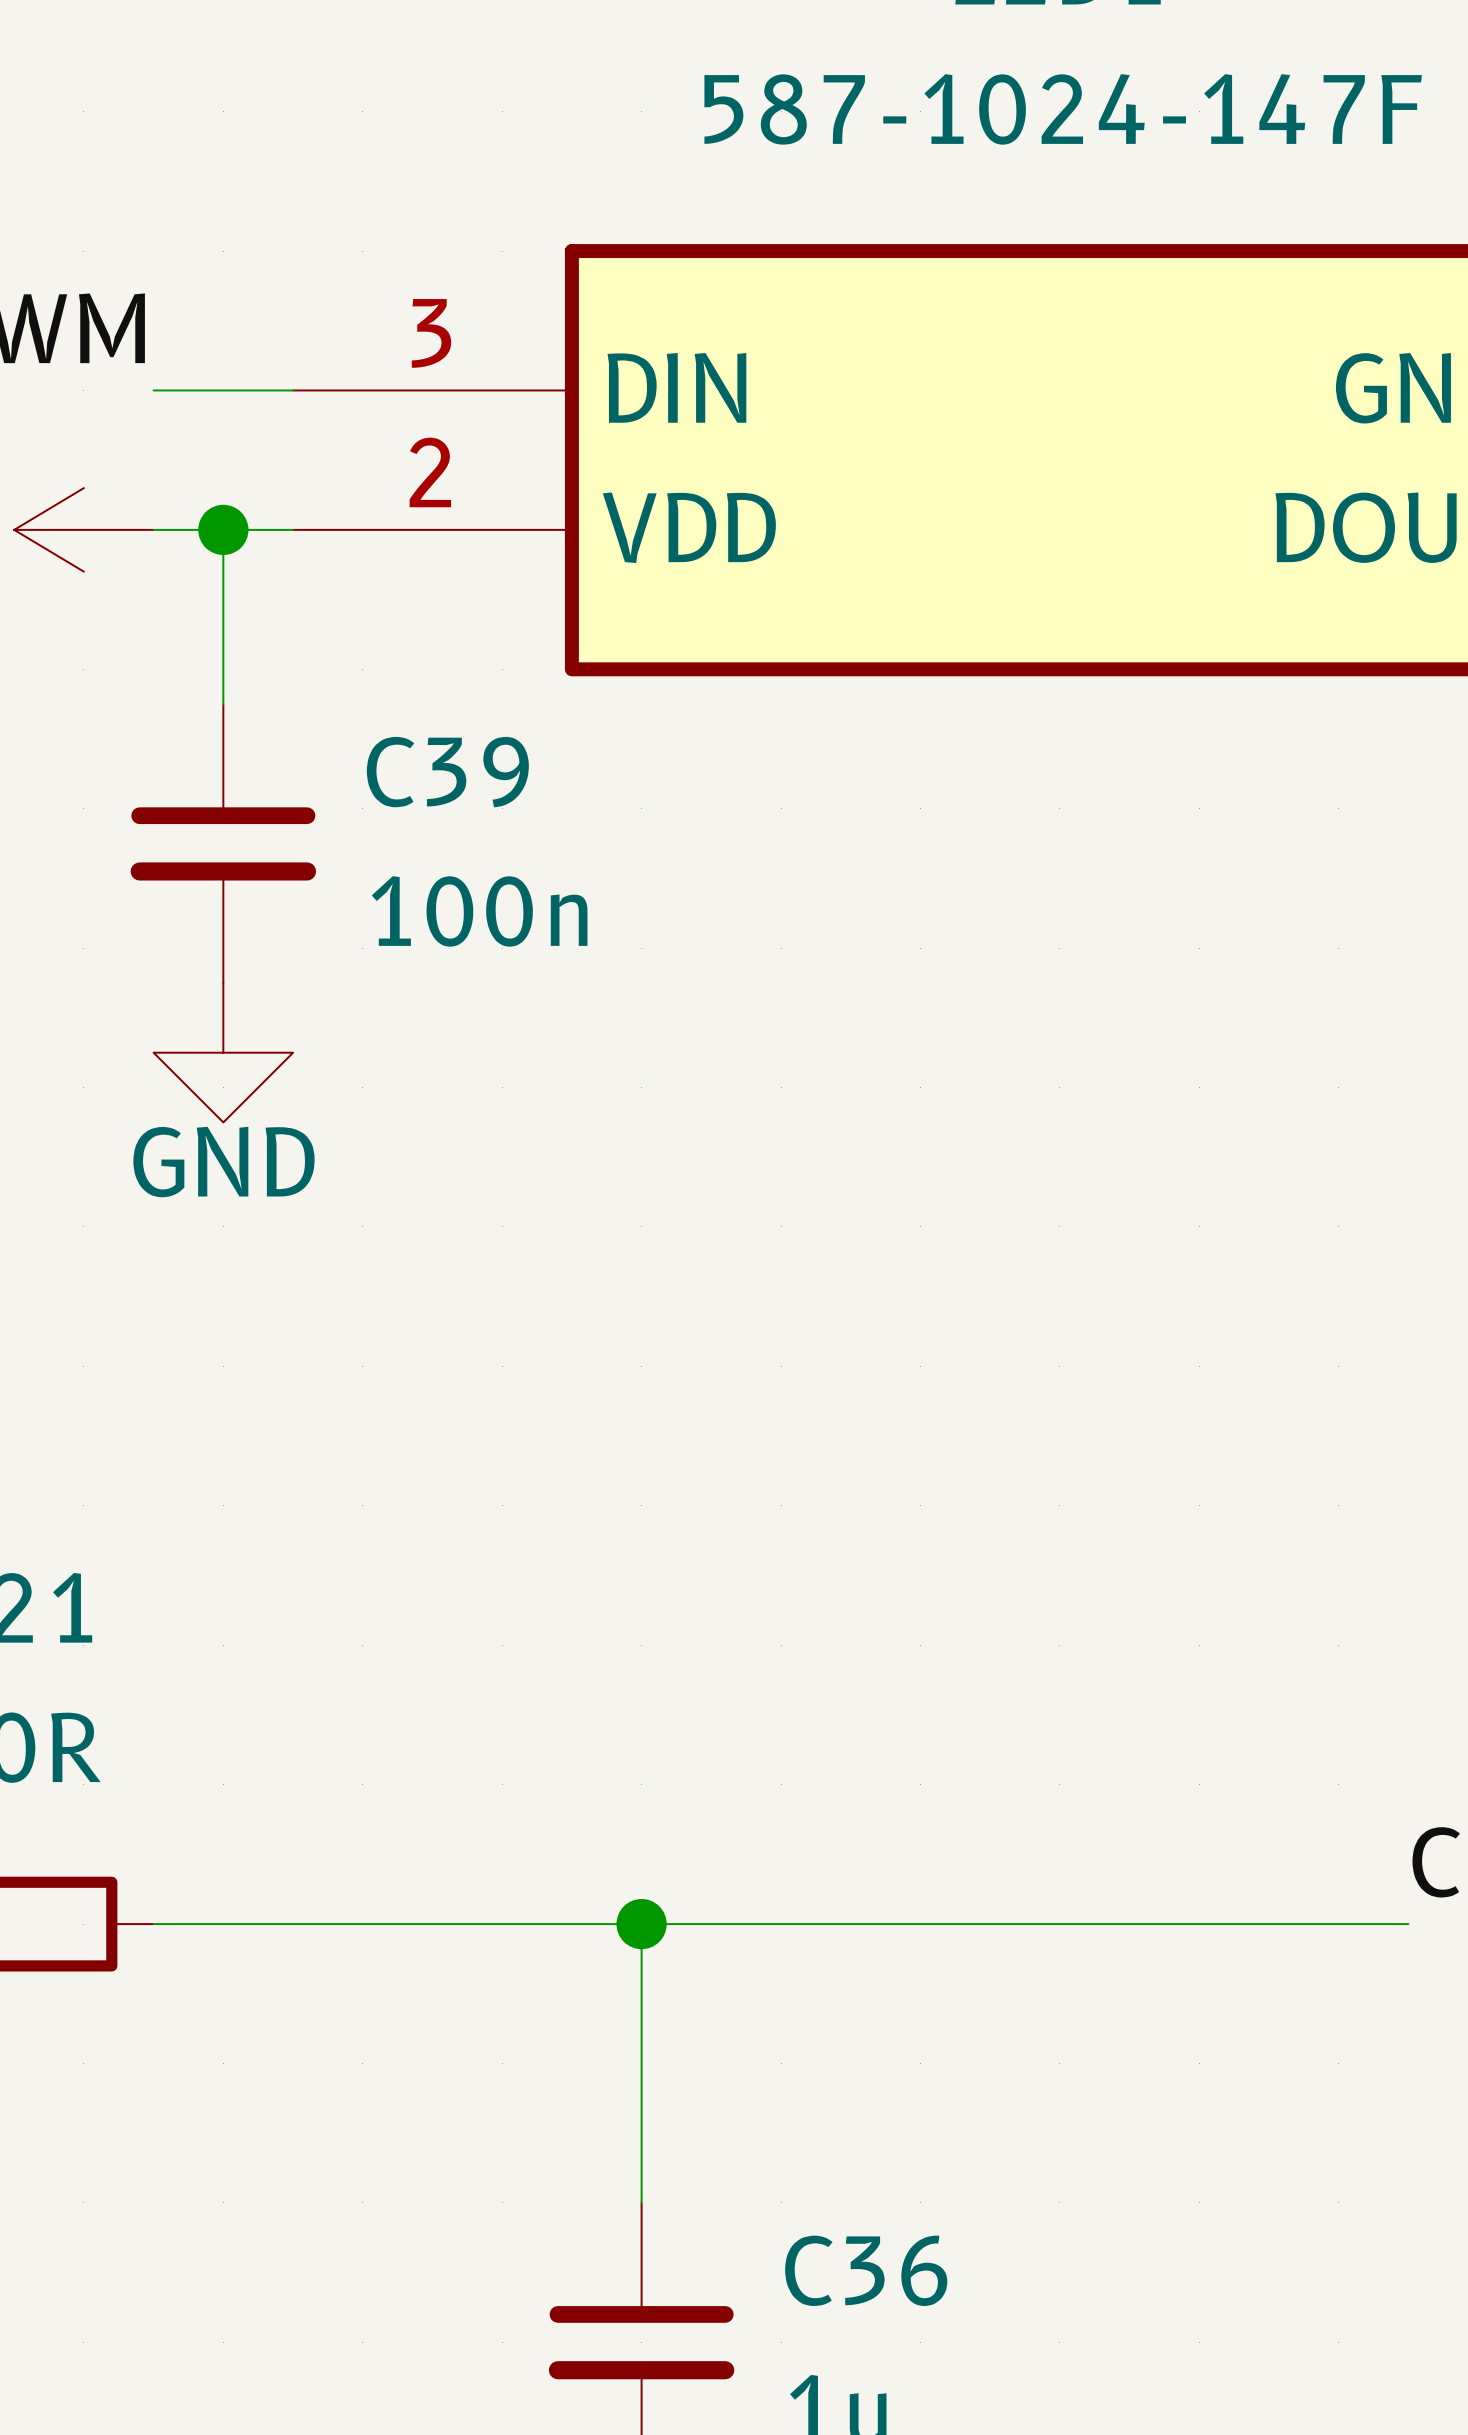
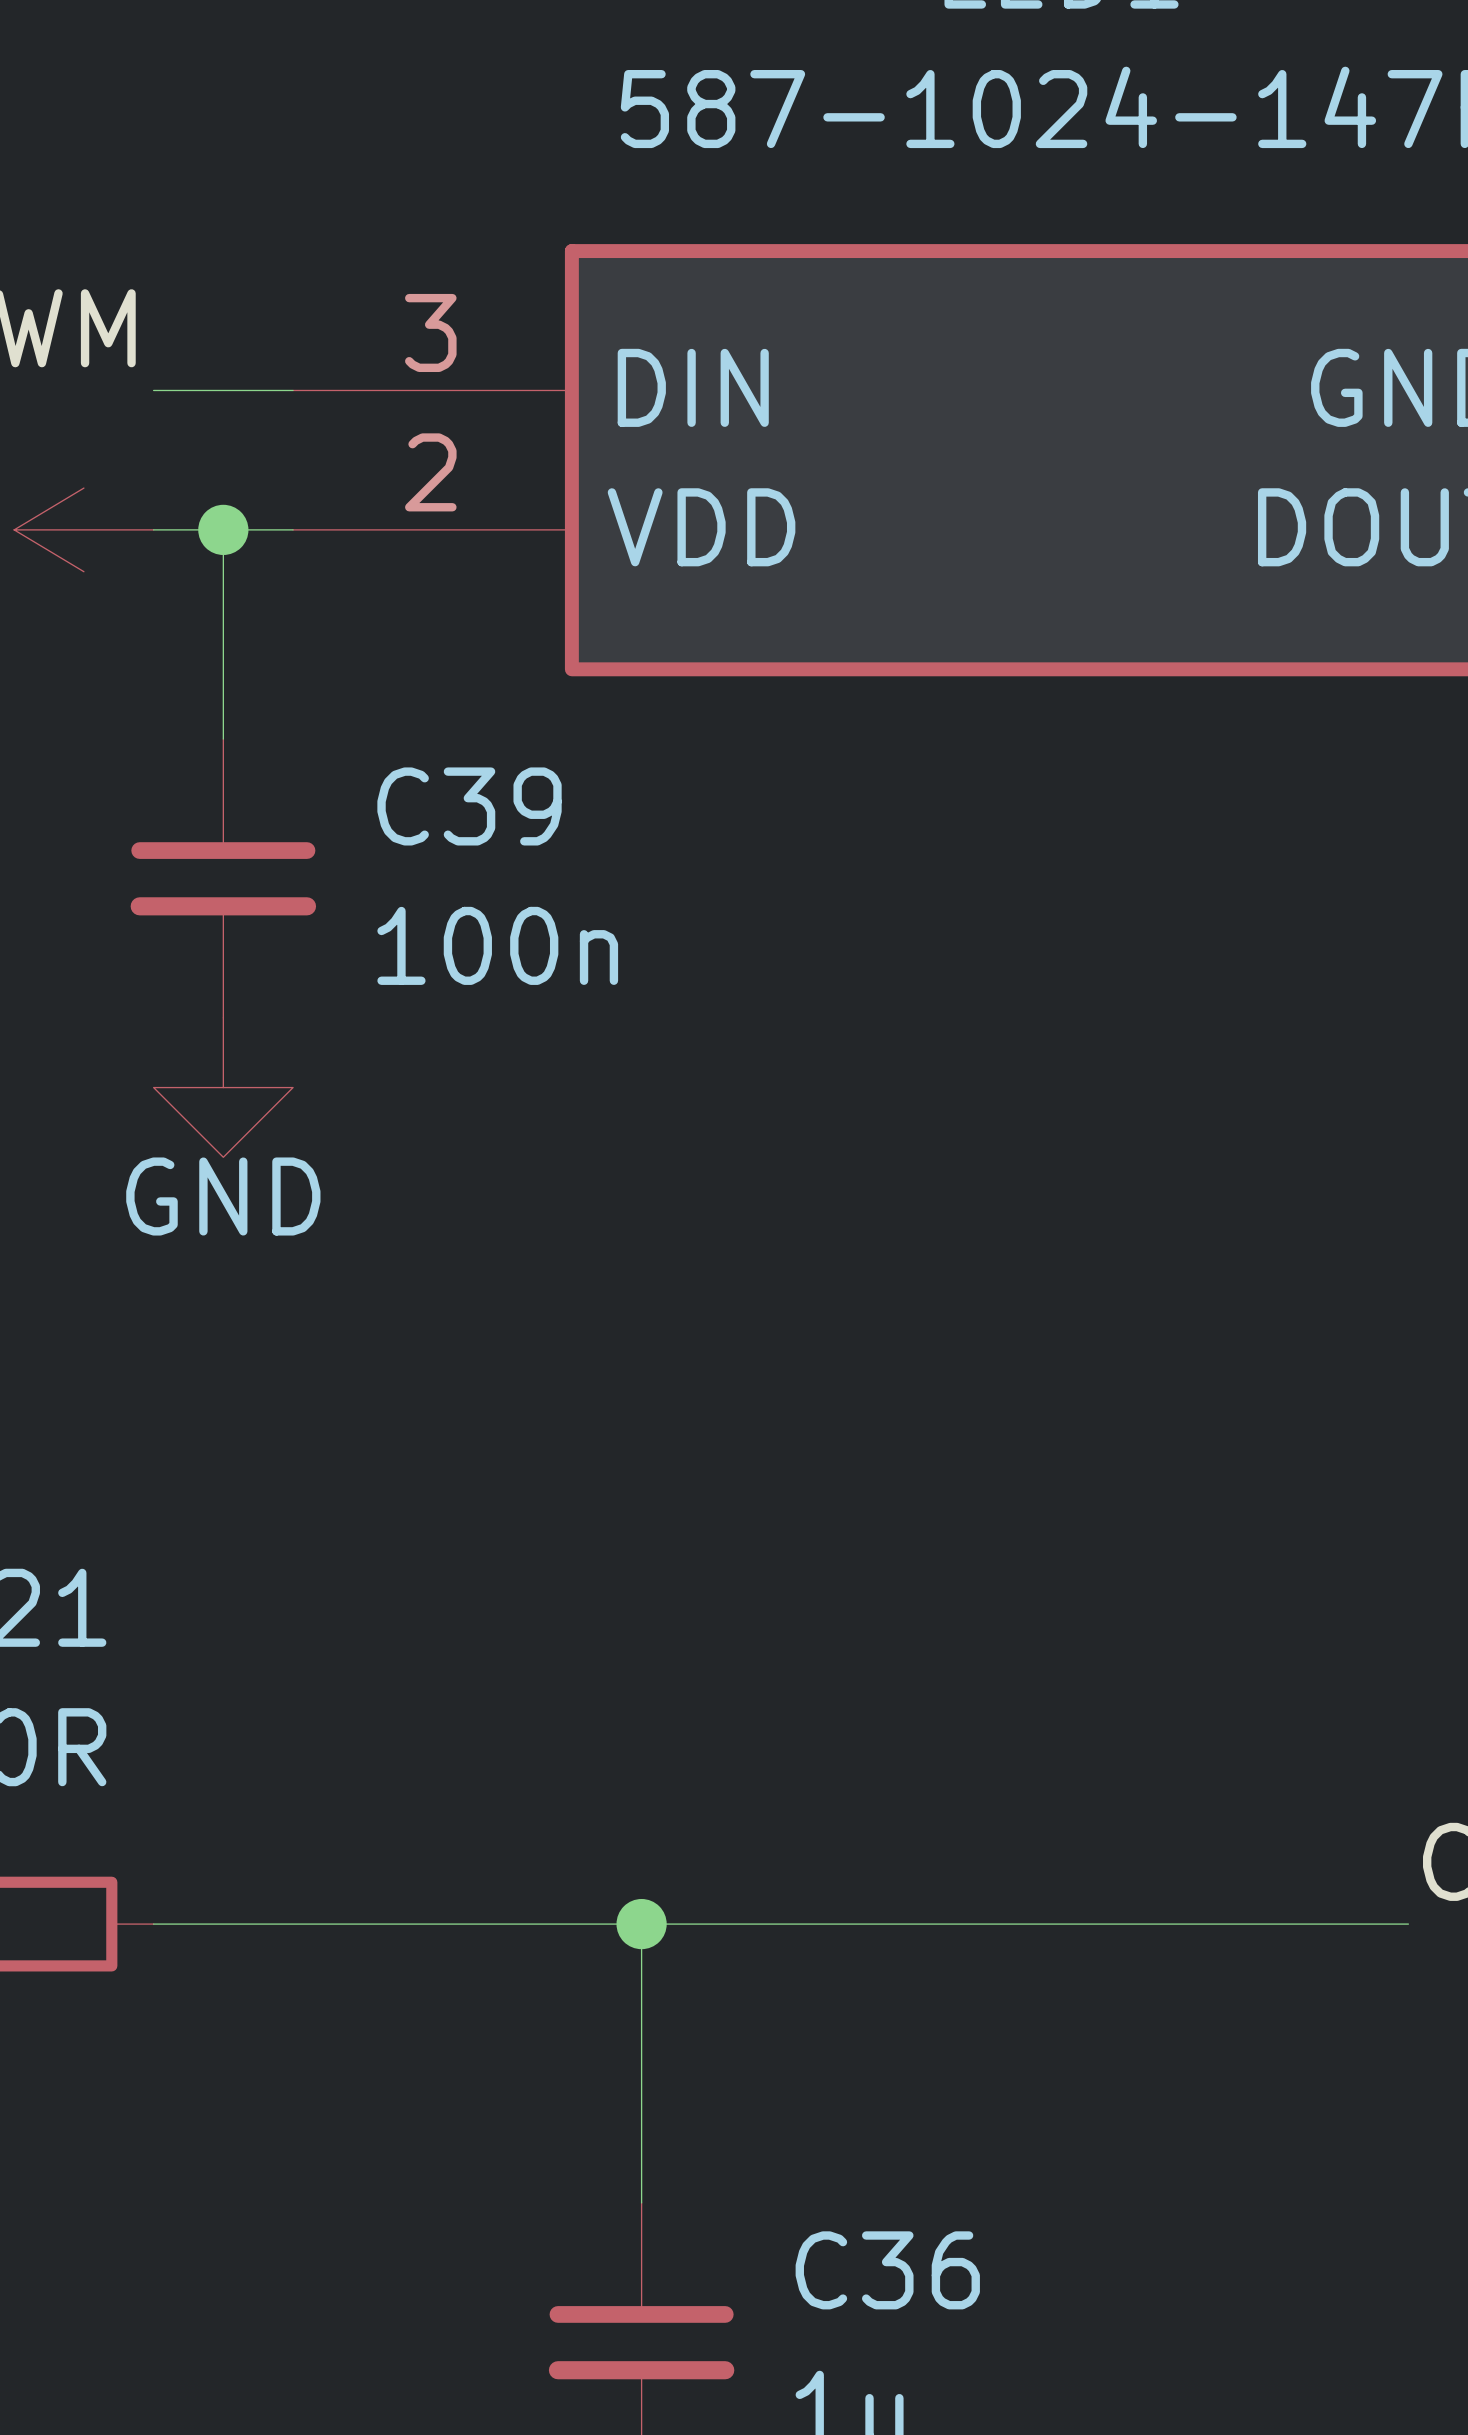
C39 position: (223, 843) -> (223, 878)
power symbol position: GND (223, 1052) -> GND (223, 1087)

